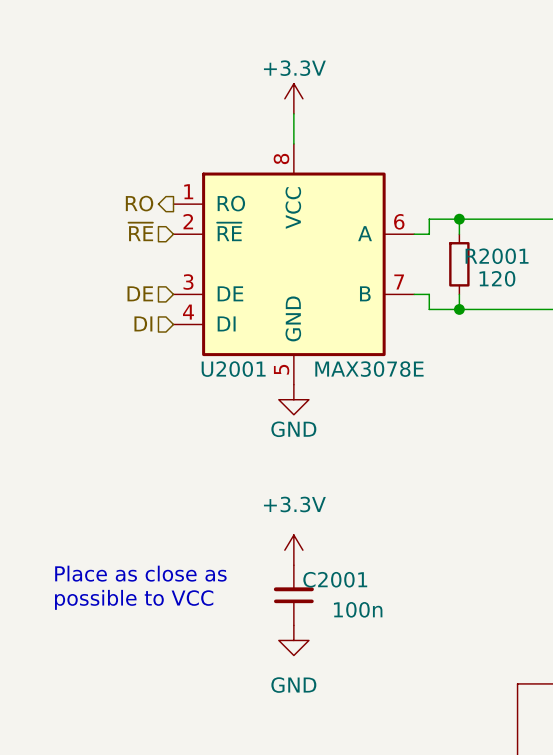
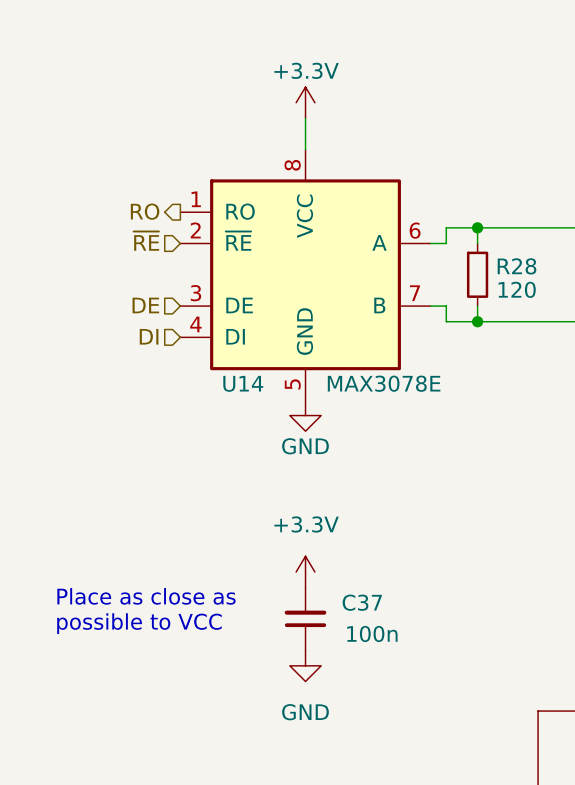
R2001 name: R2001 (497, 256) -> R28 (517, 266)
U2001 name: U2001 (233, 369) -> U14 (243, 383)
C2001 name: C2001 (335, 579) -> C37 (362, 602)

